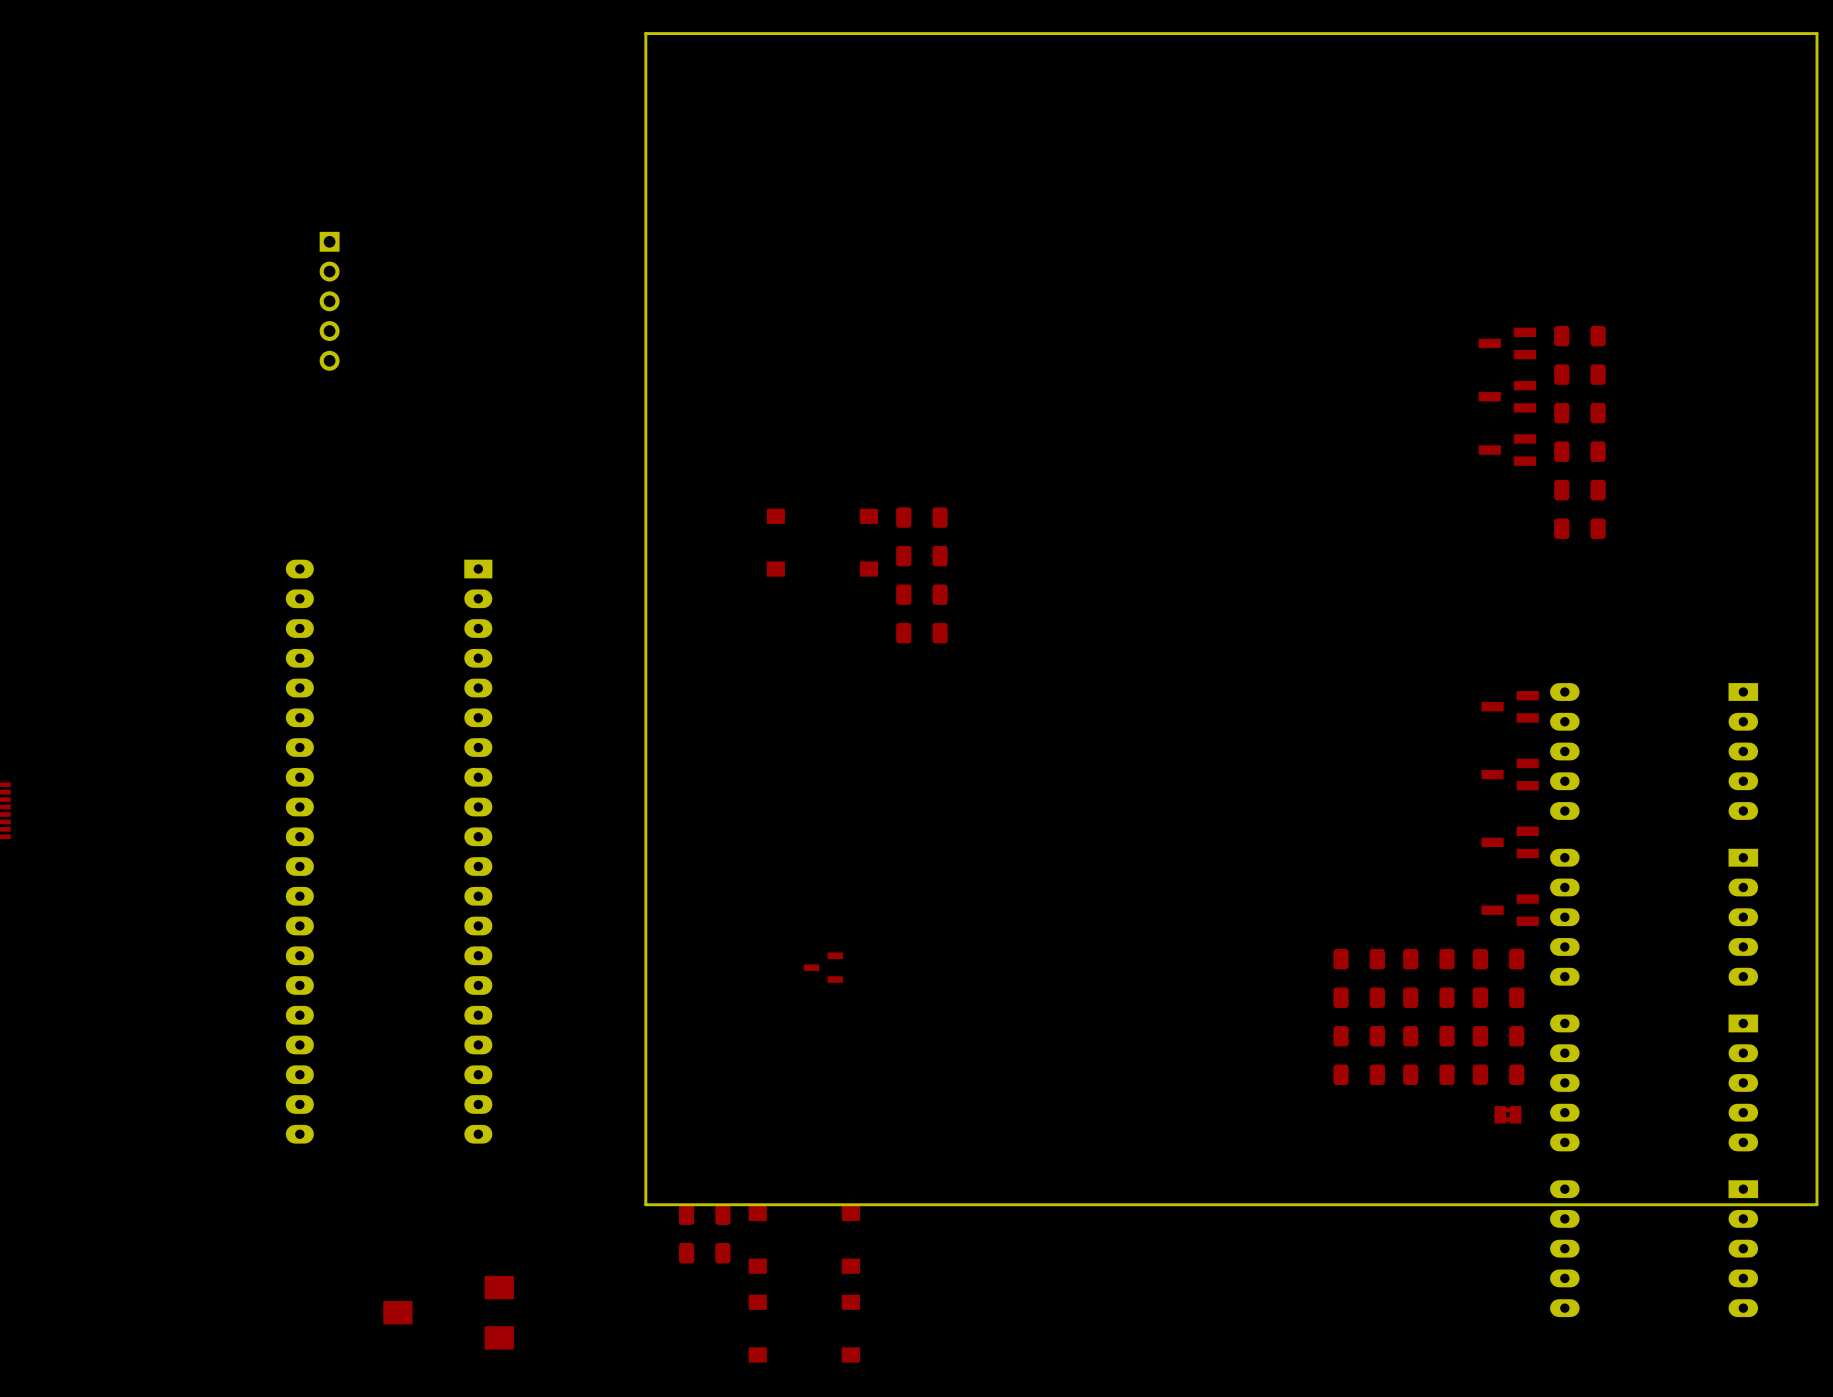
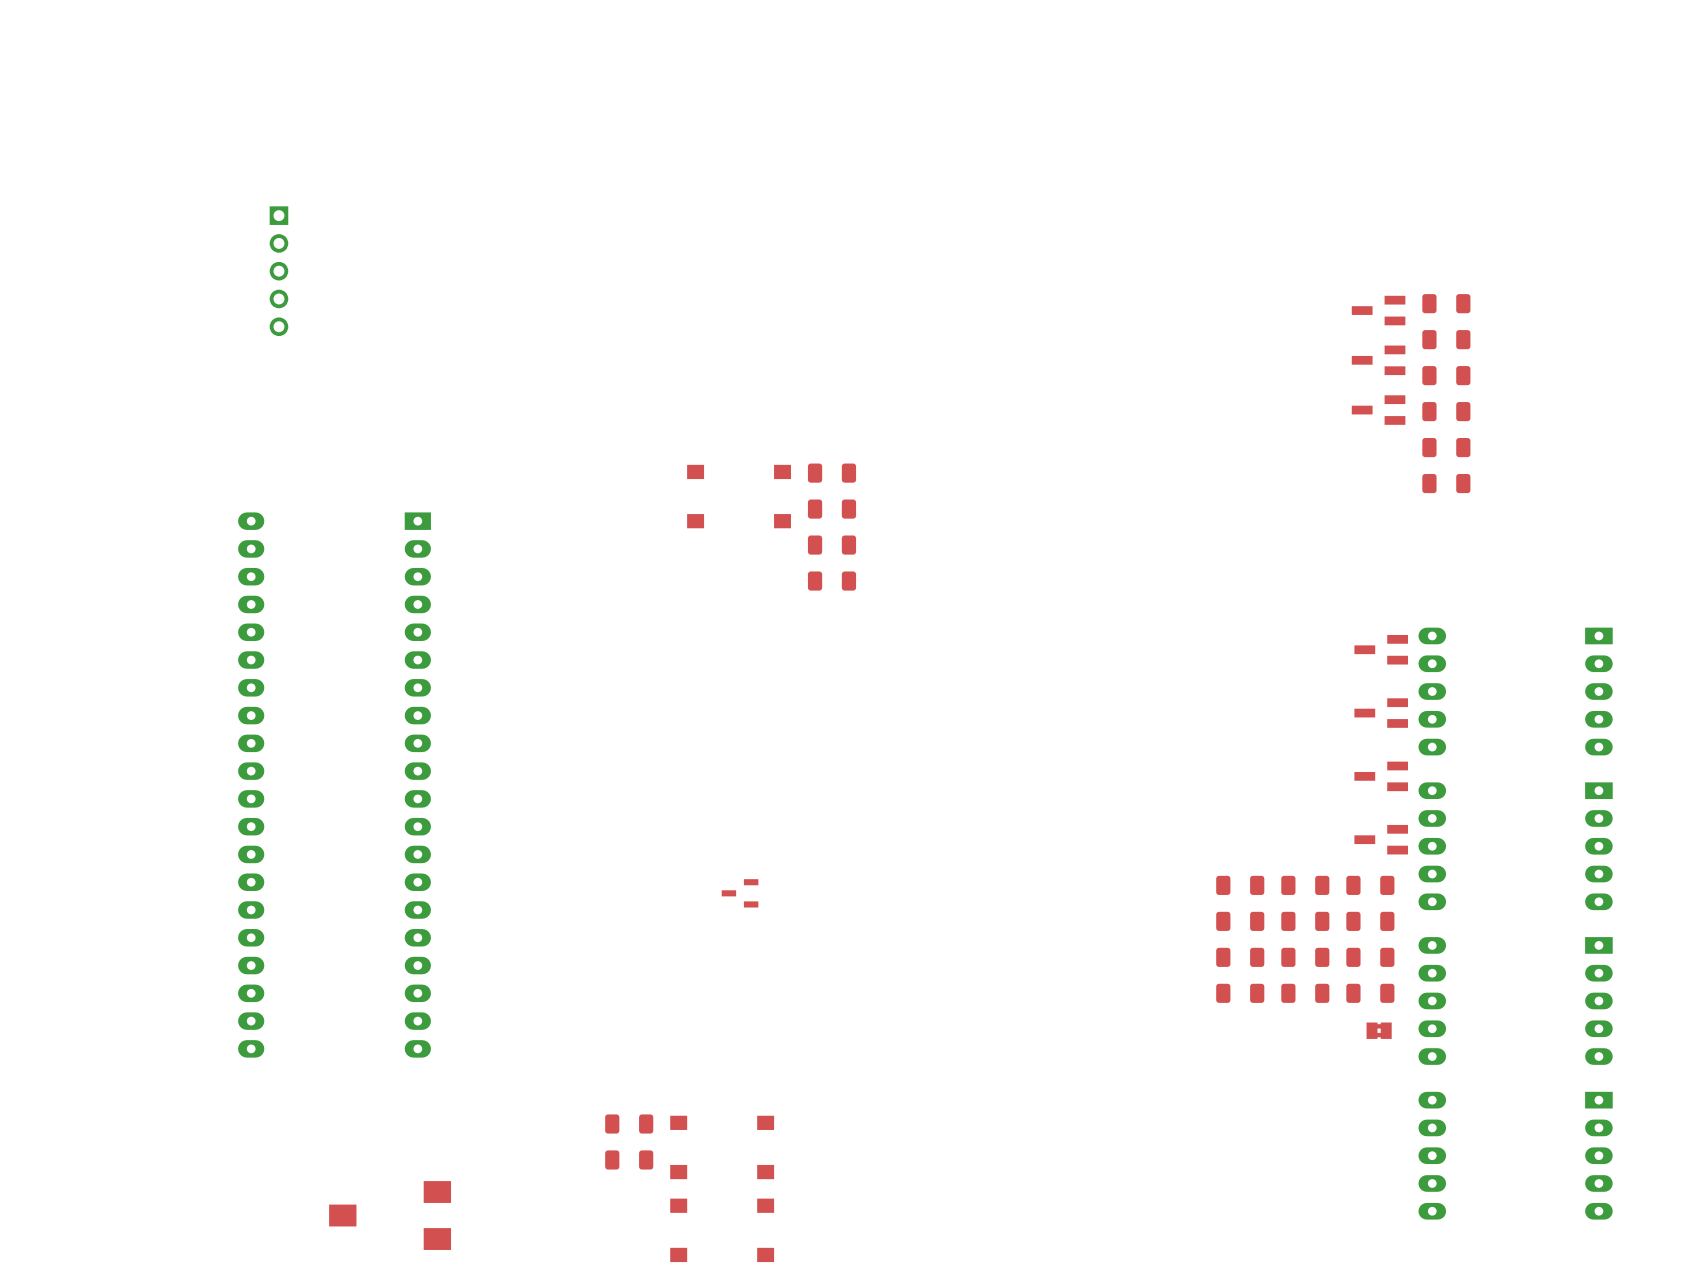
board edge: (1816, 33) (645, 33) (645, 1204) (1816, 1204) (1816, 33) -> none

